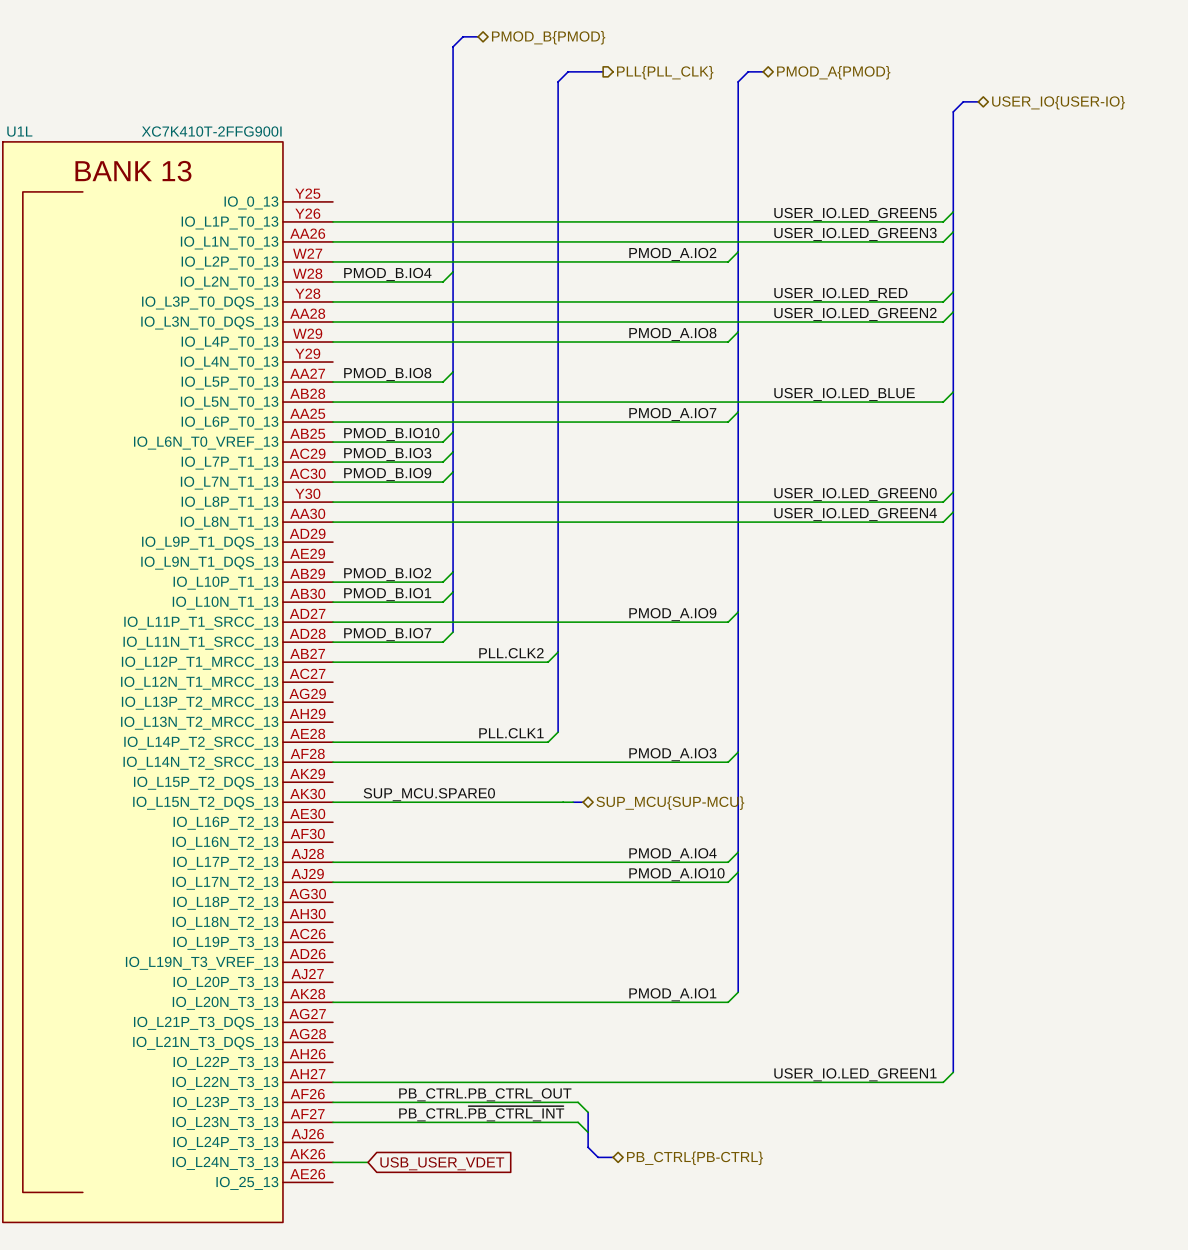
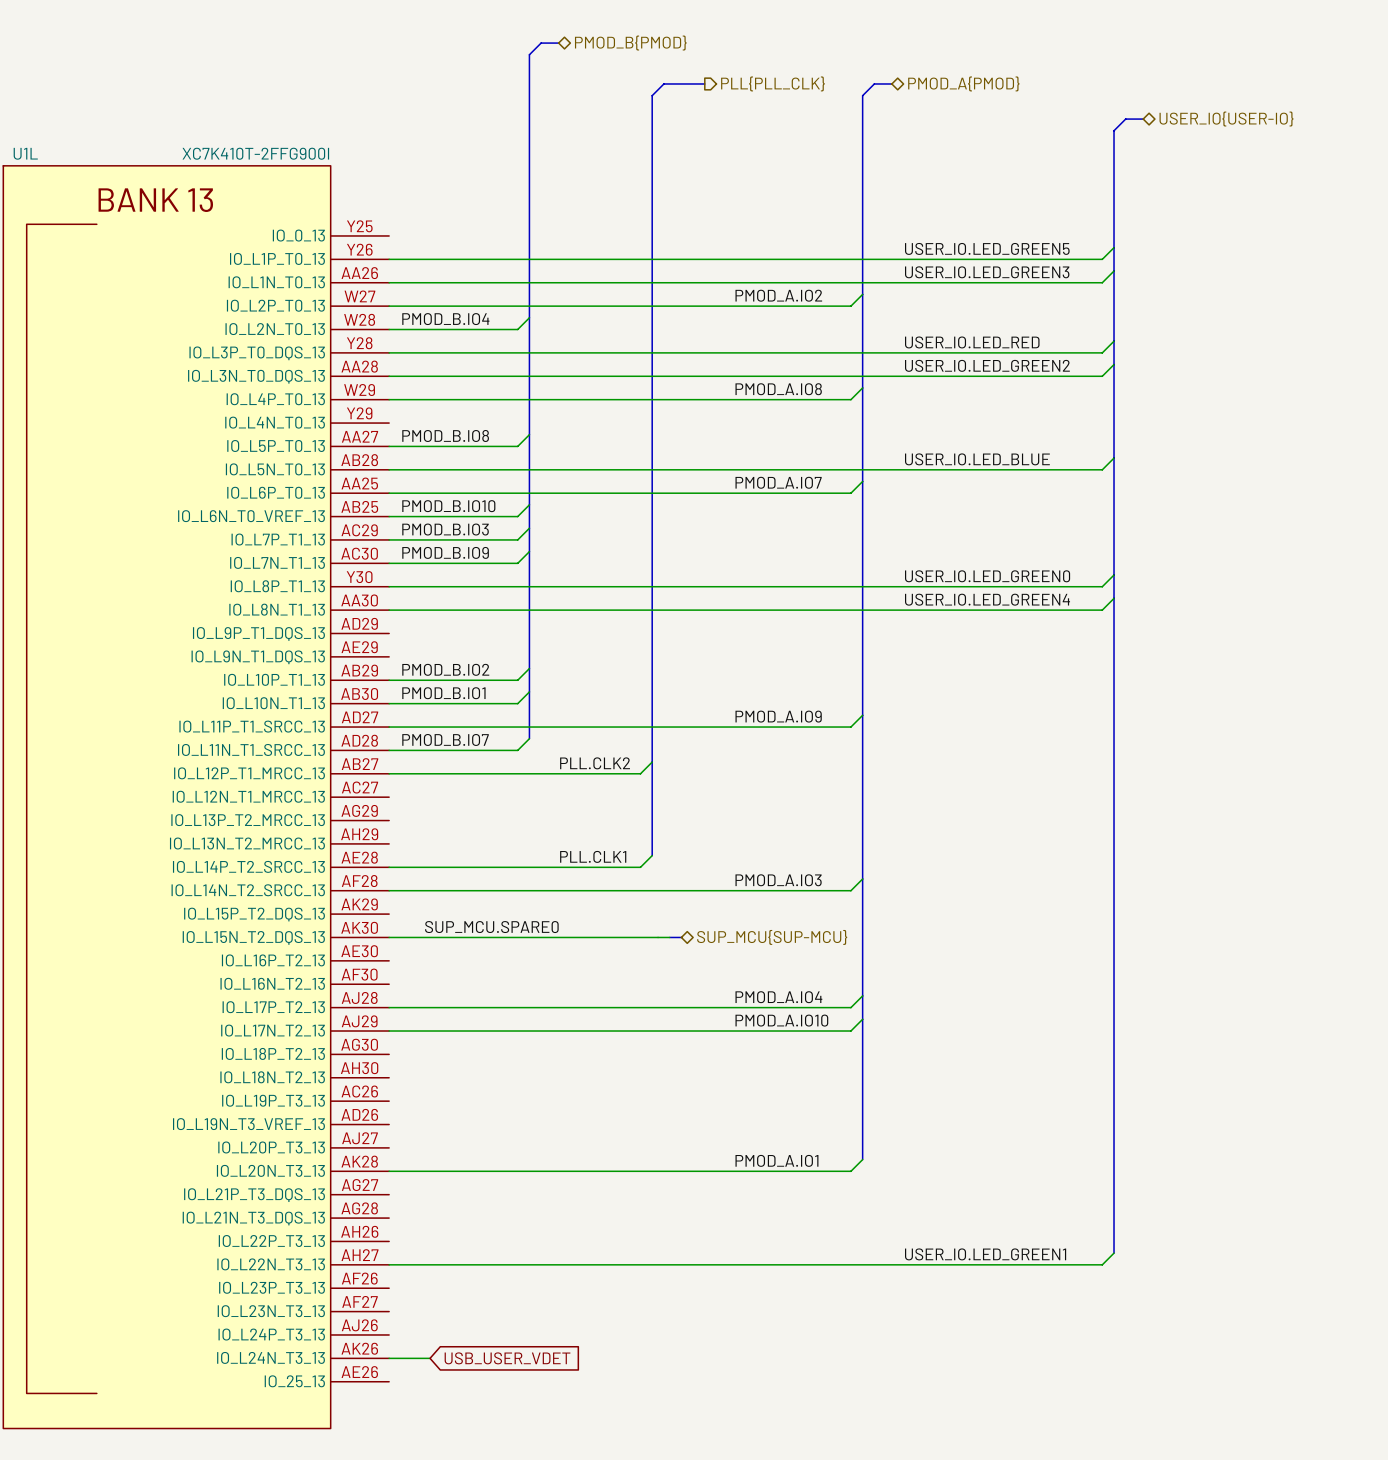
label: PB_CTRL.PB_CTRL_OUT (485, 1094) -> none
wire: (332, 1102) (578, 1102) (588, 1112) -> none
bus: (588, 1112) (588, 1147) (598, 1157) (613, 1157) -> none
label: PB_CTRL.~{PB_CTRL_INT} (481, 1113) -> none
wire: (332, 1122) (578, 1122) (588, 1132) -> none
hierarchical label: PB_CTRL{PB-CTRL} (695, 1158) -> none

